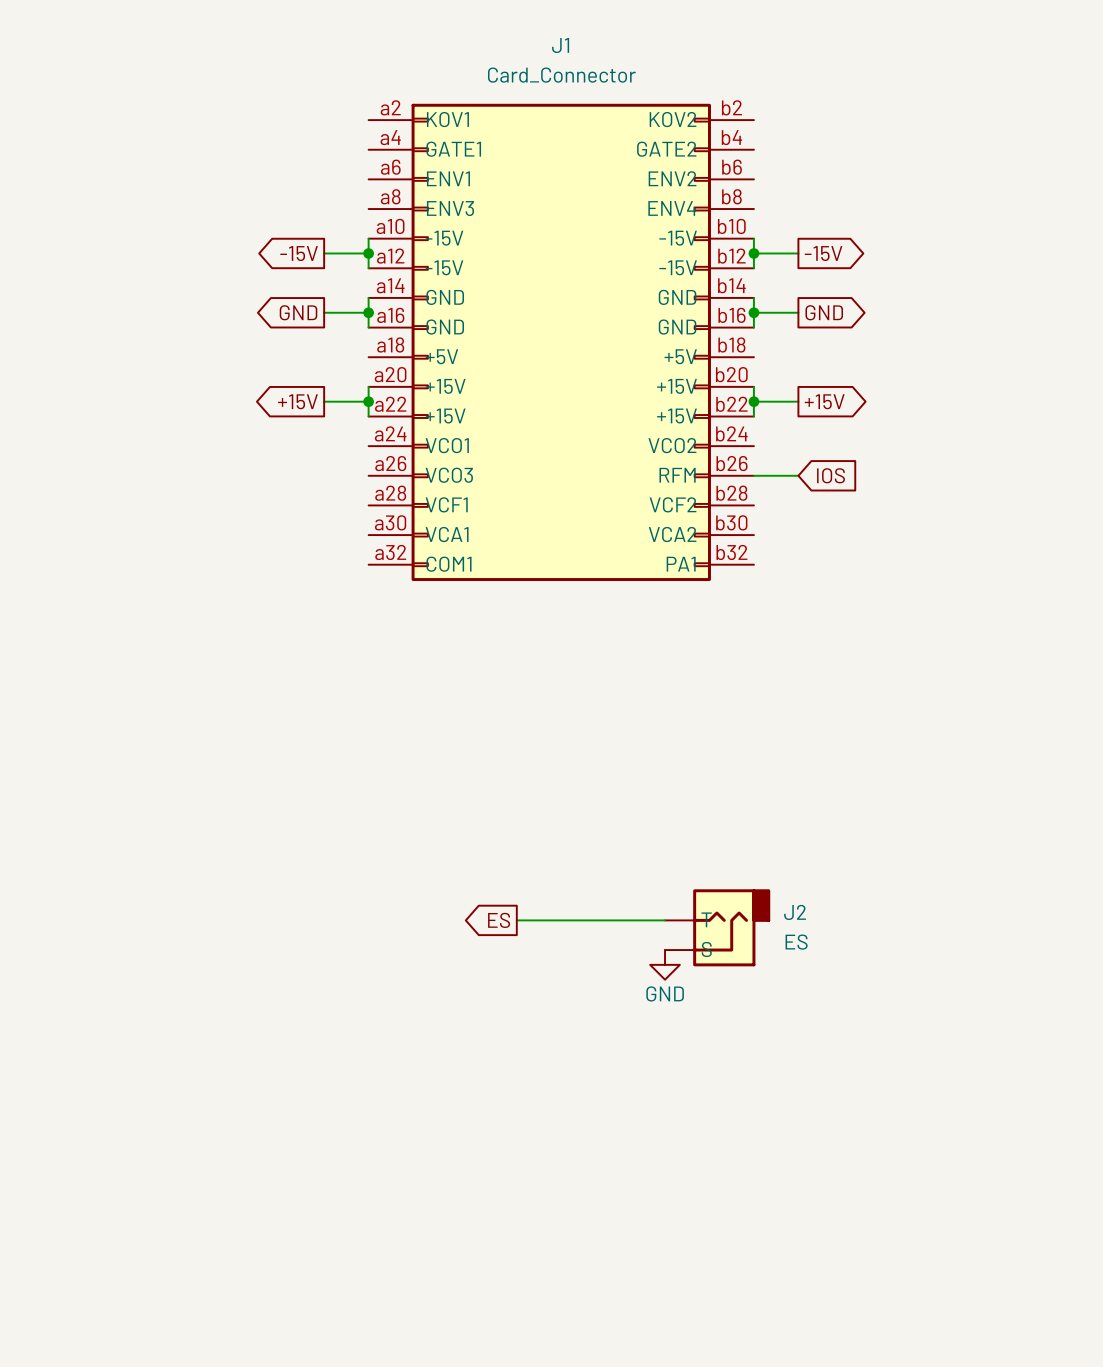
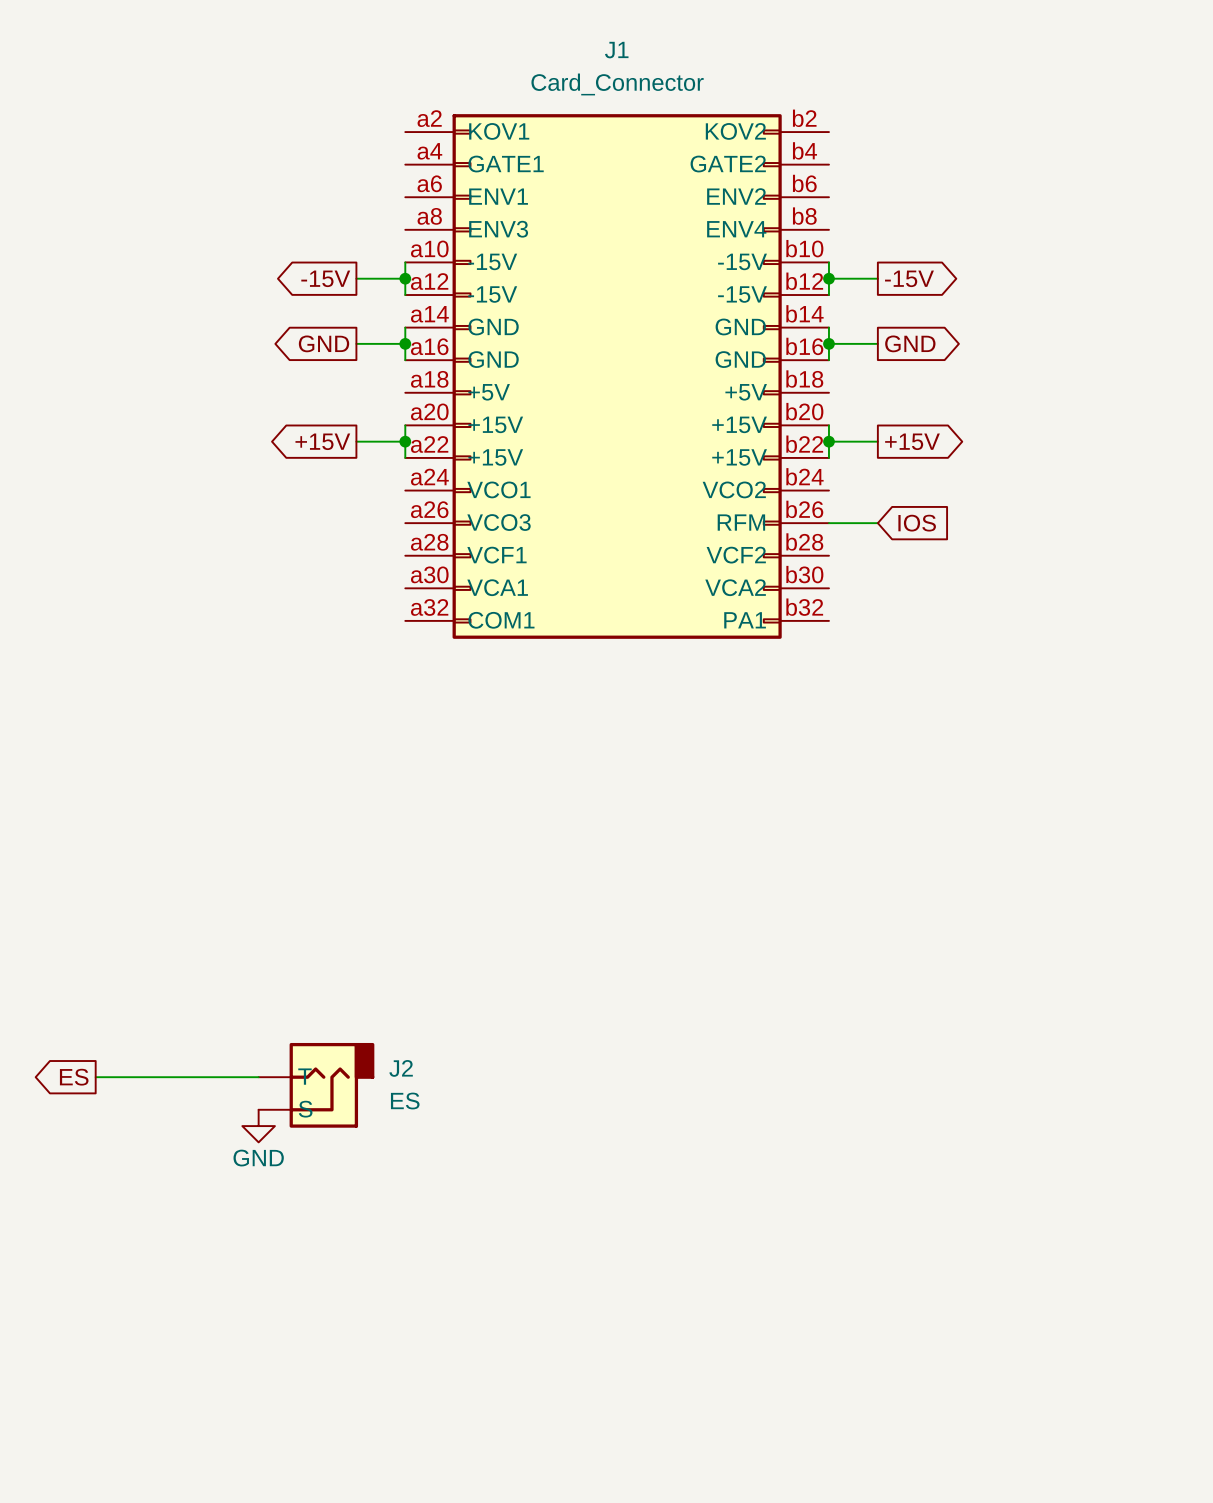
global label: ES (499, 920) -> none
wire: (516, 920) (665, 920) -> none
J2 position: (717, 927) -> (316, 1085)
power symbol: GND (665, 964) -> none
global label: none -> ES (74, 1077)
wire: none -> (95, 1077) (258, 1077)
power symbol: none -> GND (258, 1126)

